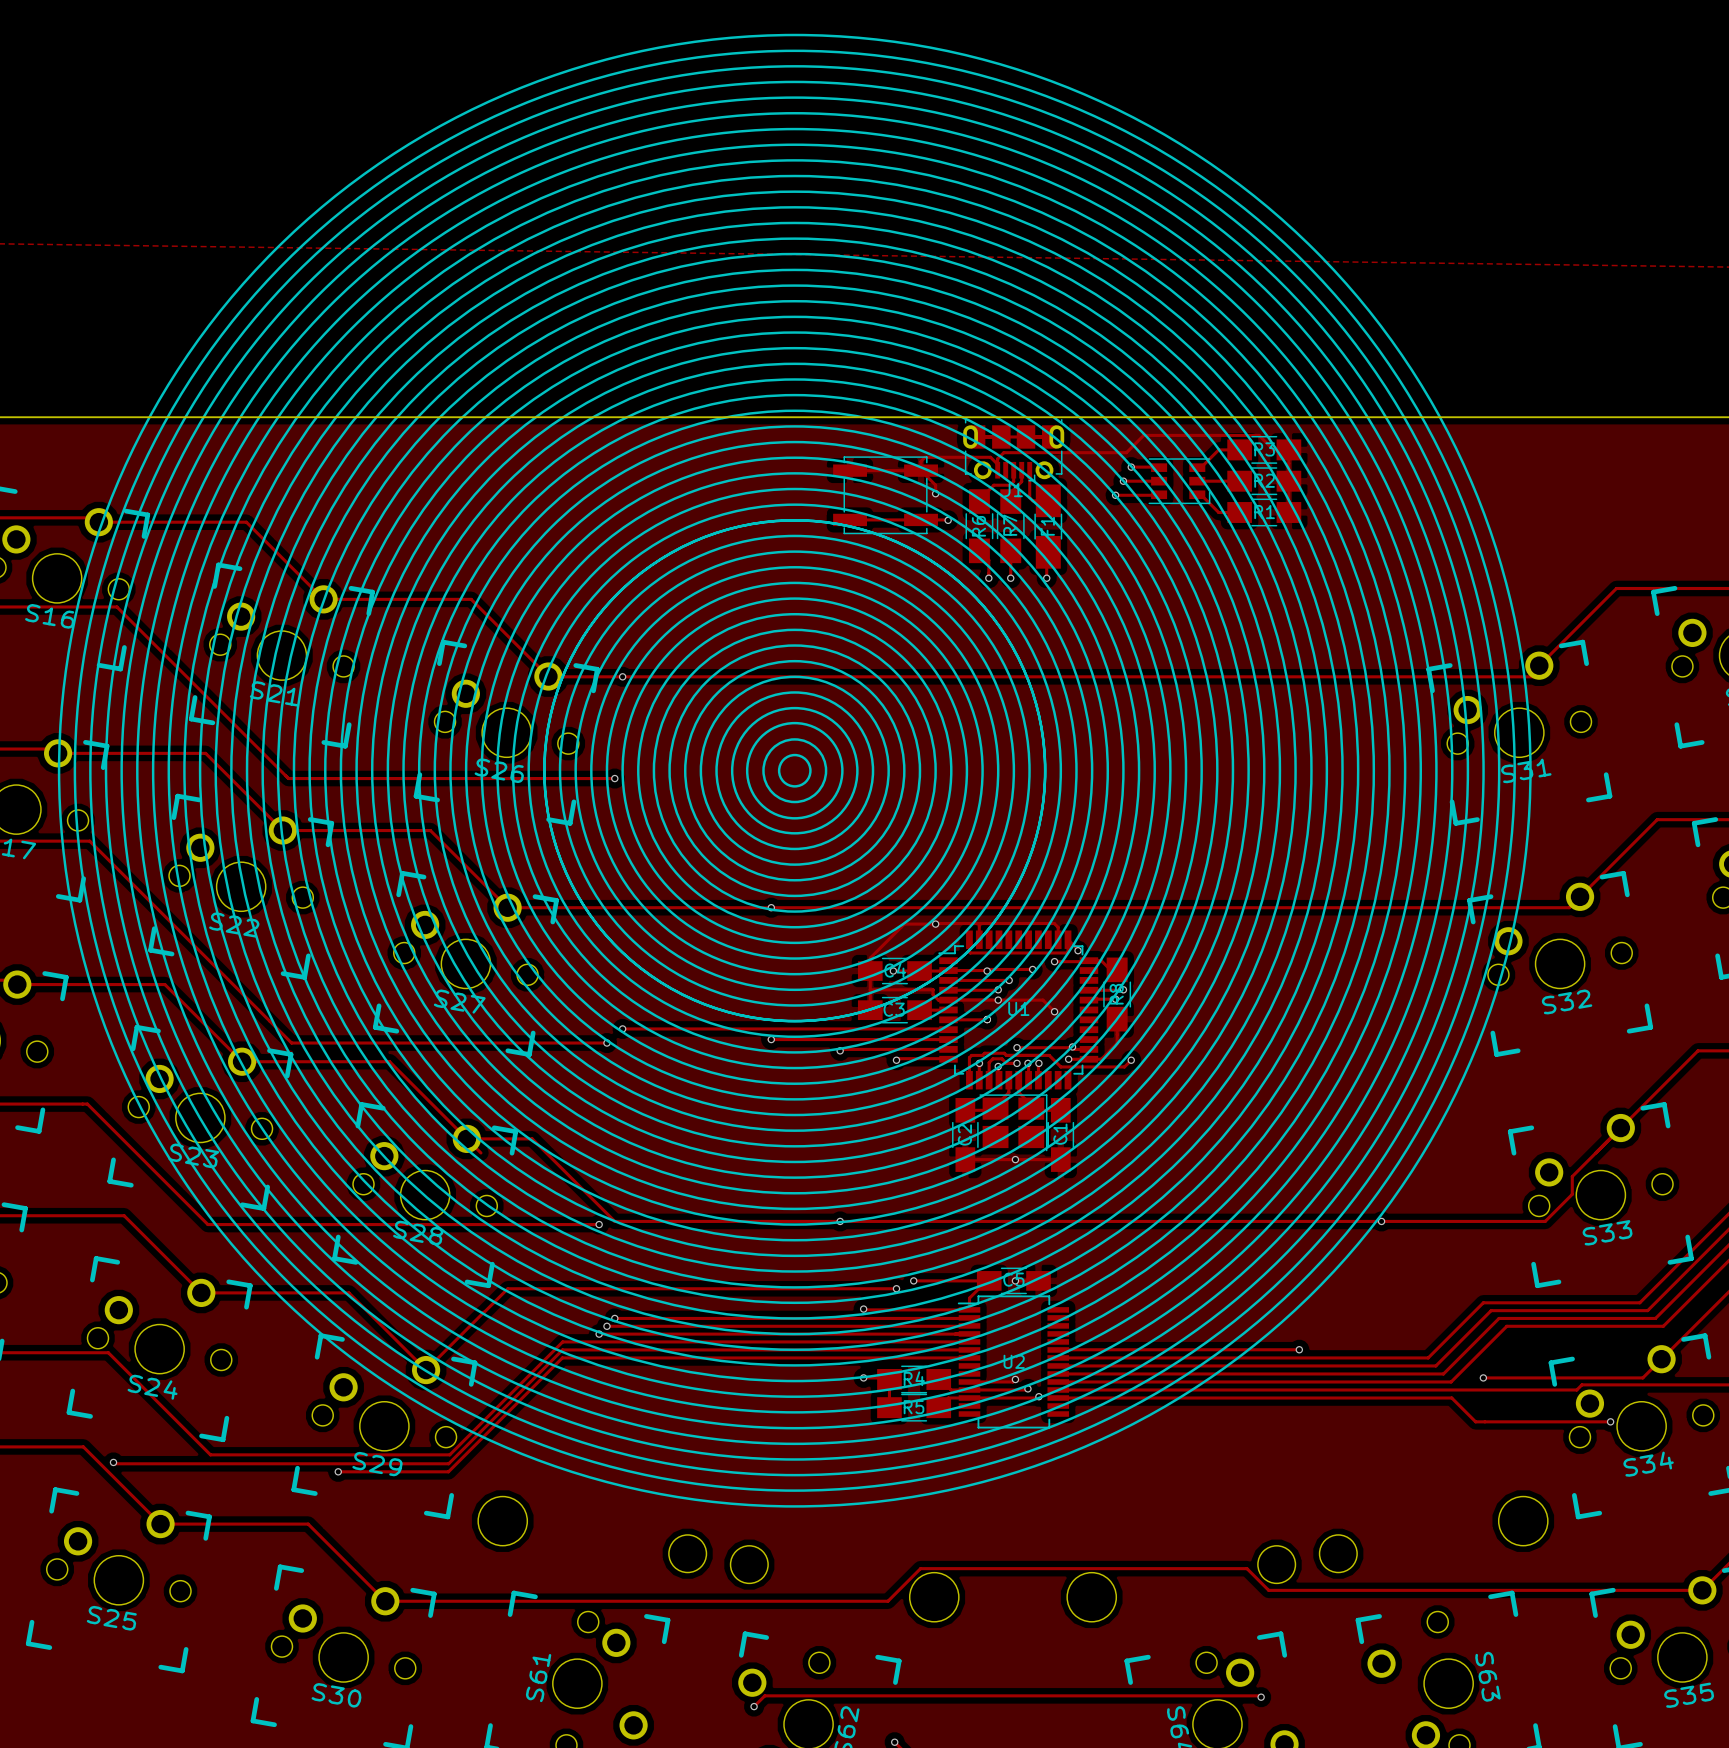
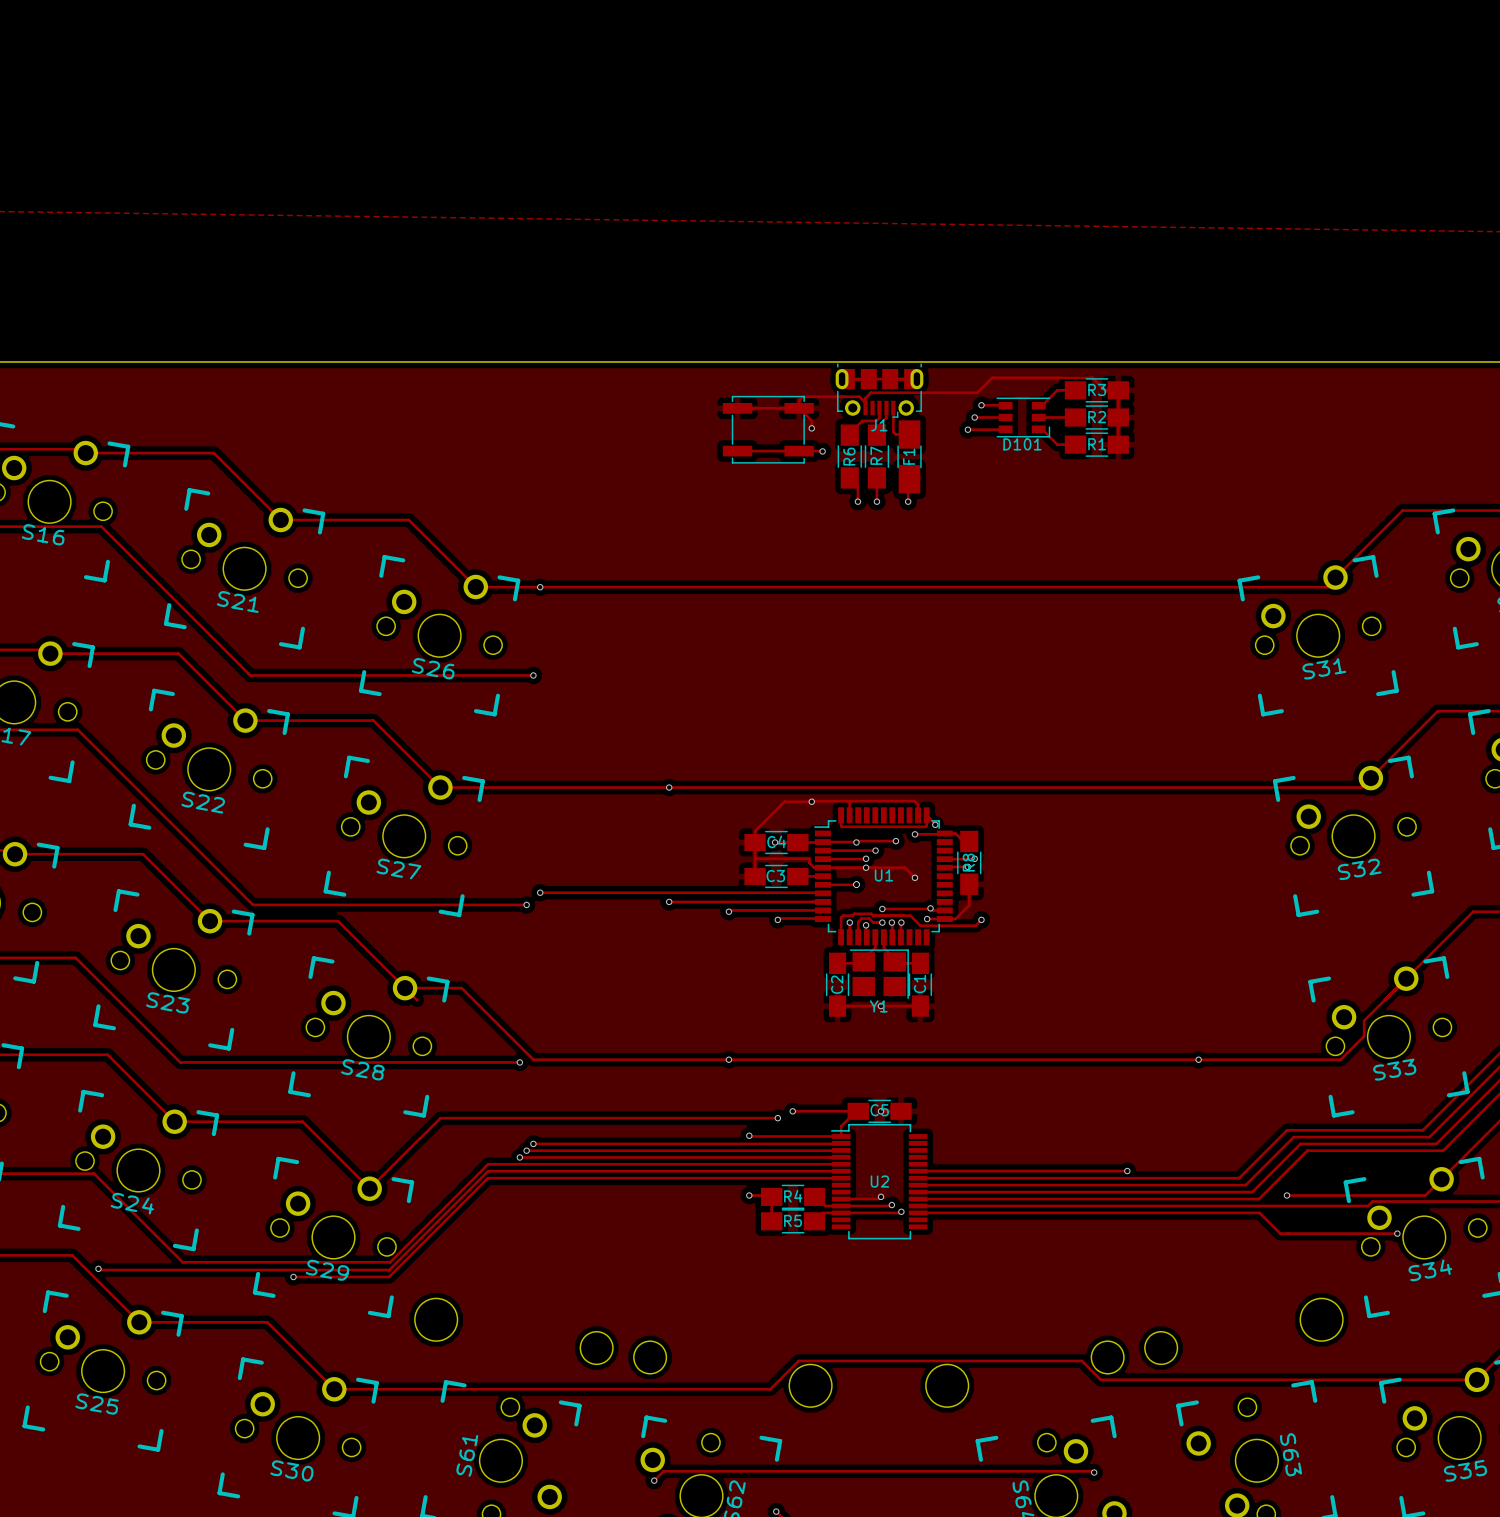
drawing: [57, 33, 1532, 1508] -> none
D101 name: none -> D101 (1022, 444)
Y1 name: none -> Y1 (878, 1006)

